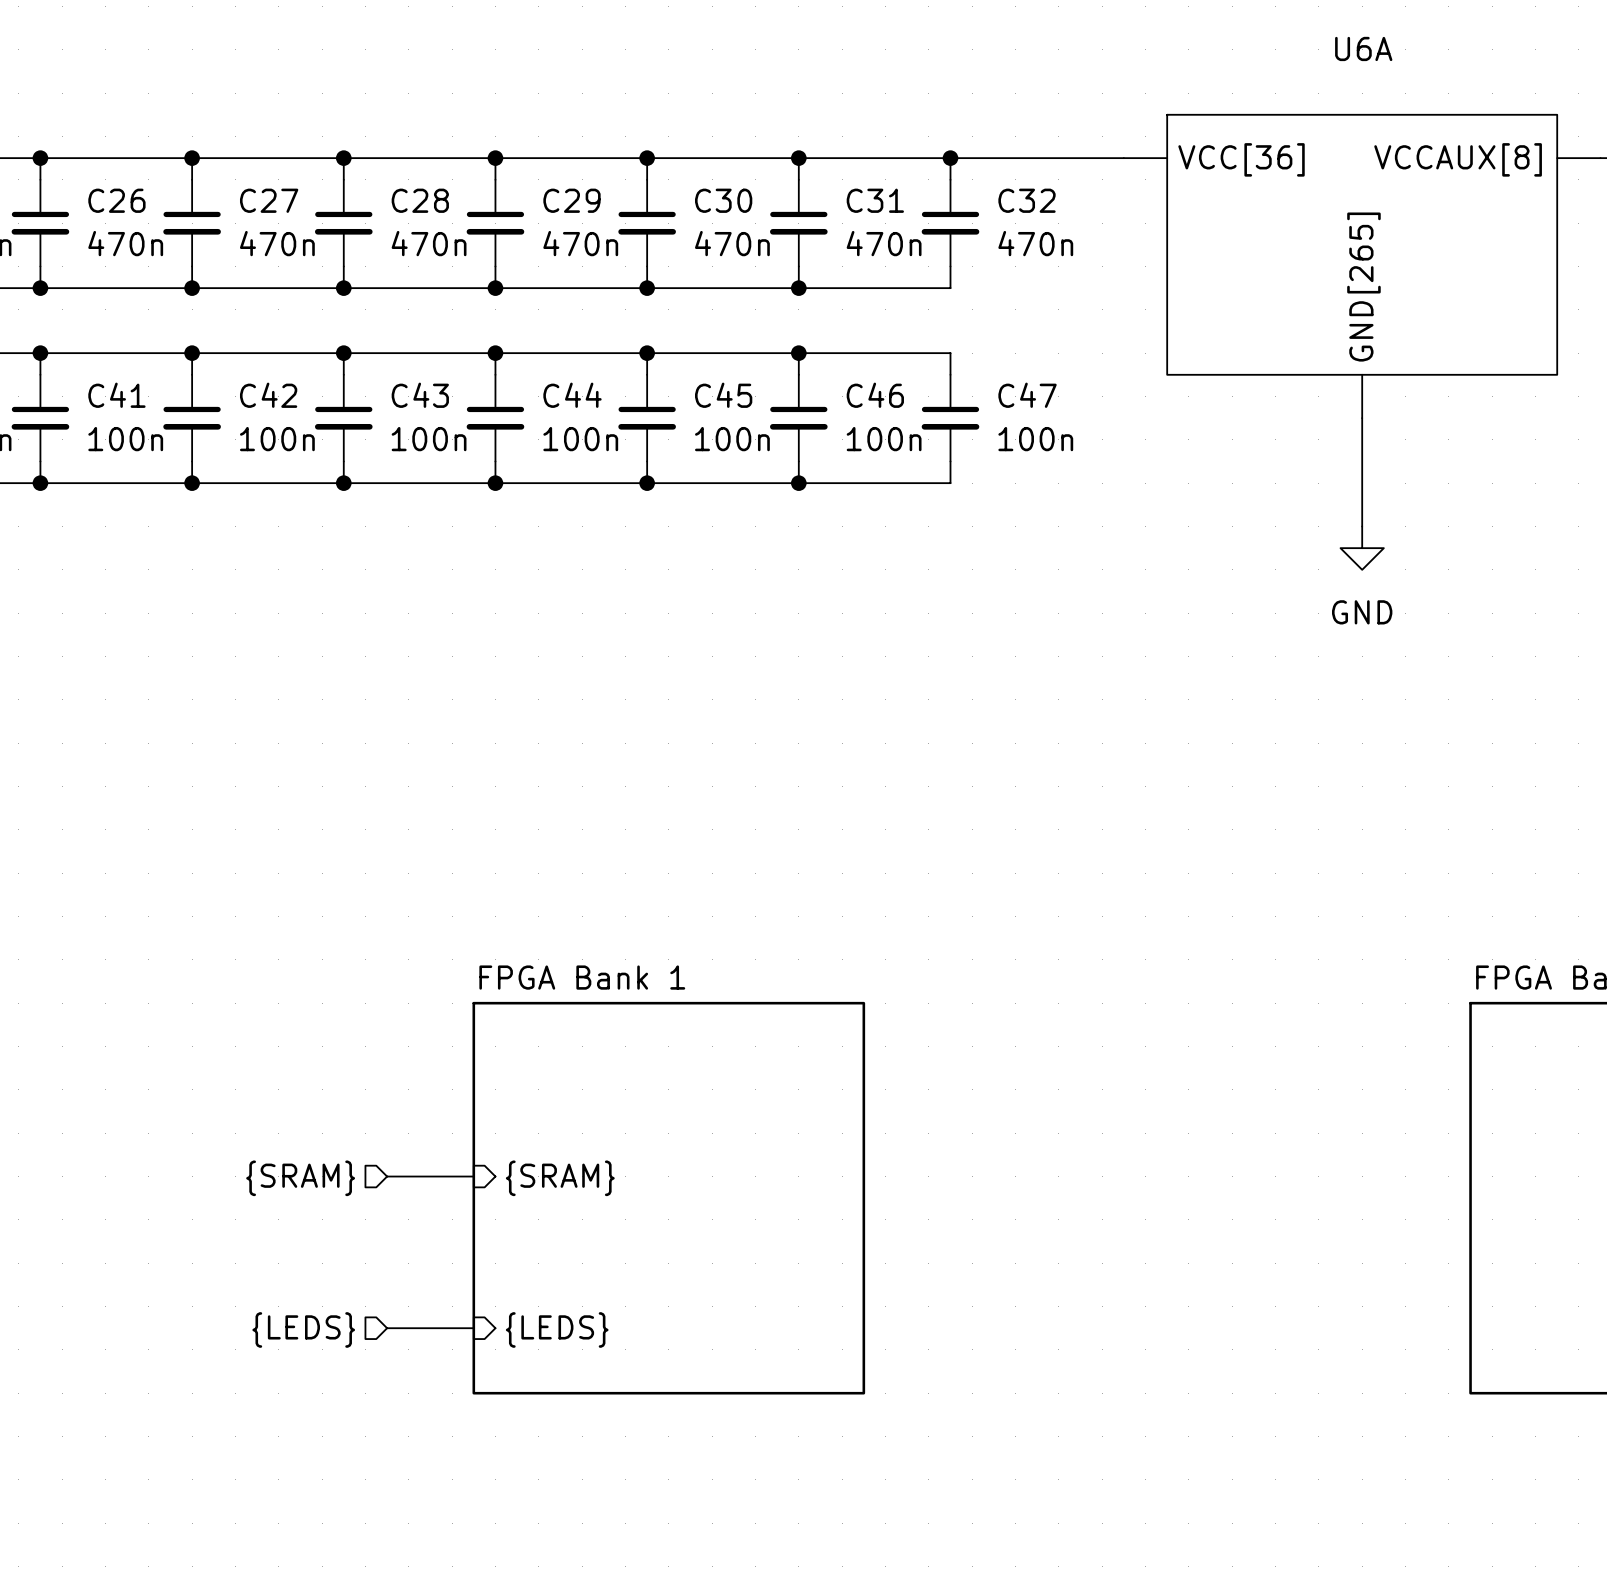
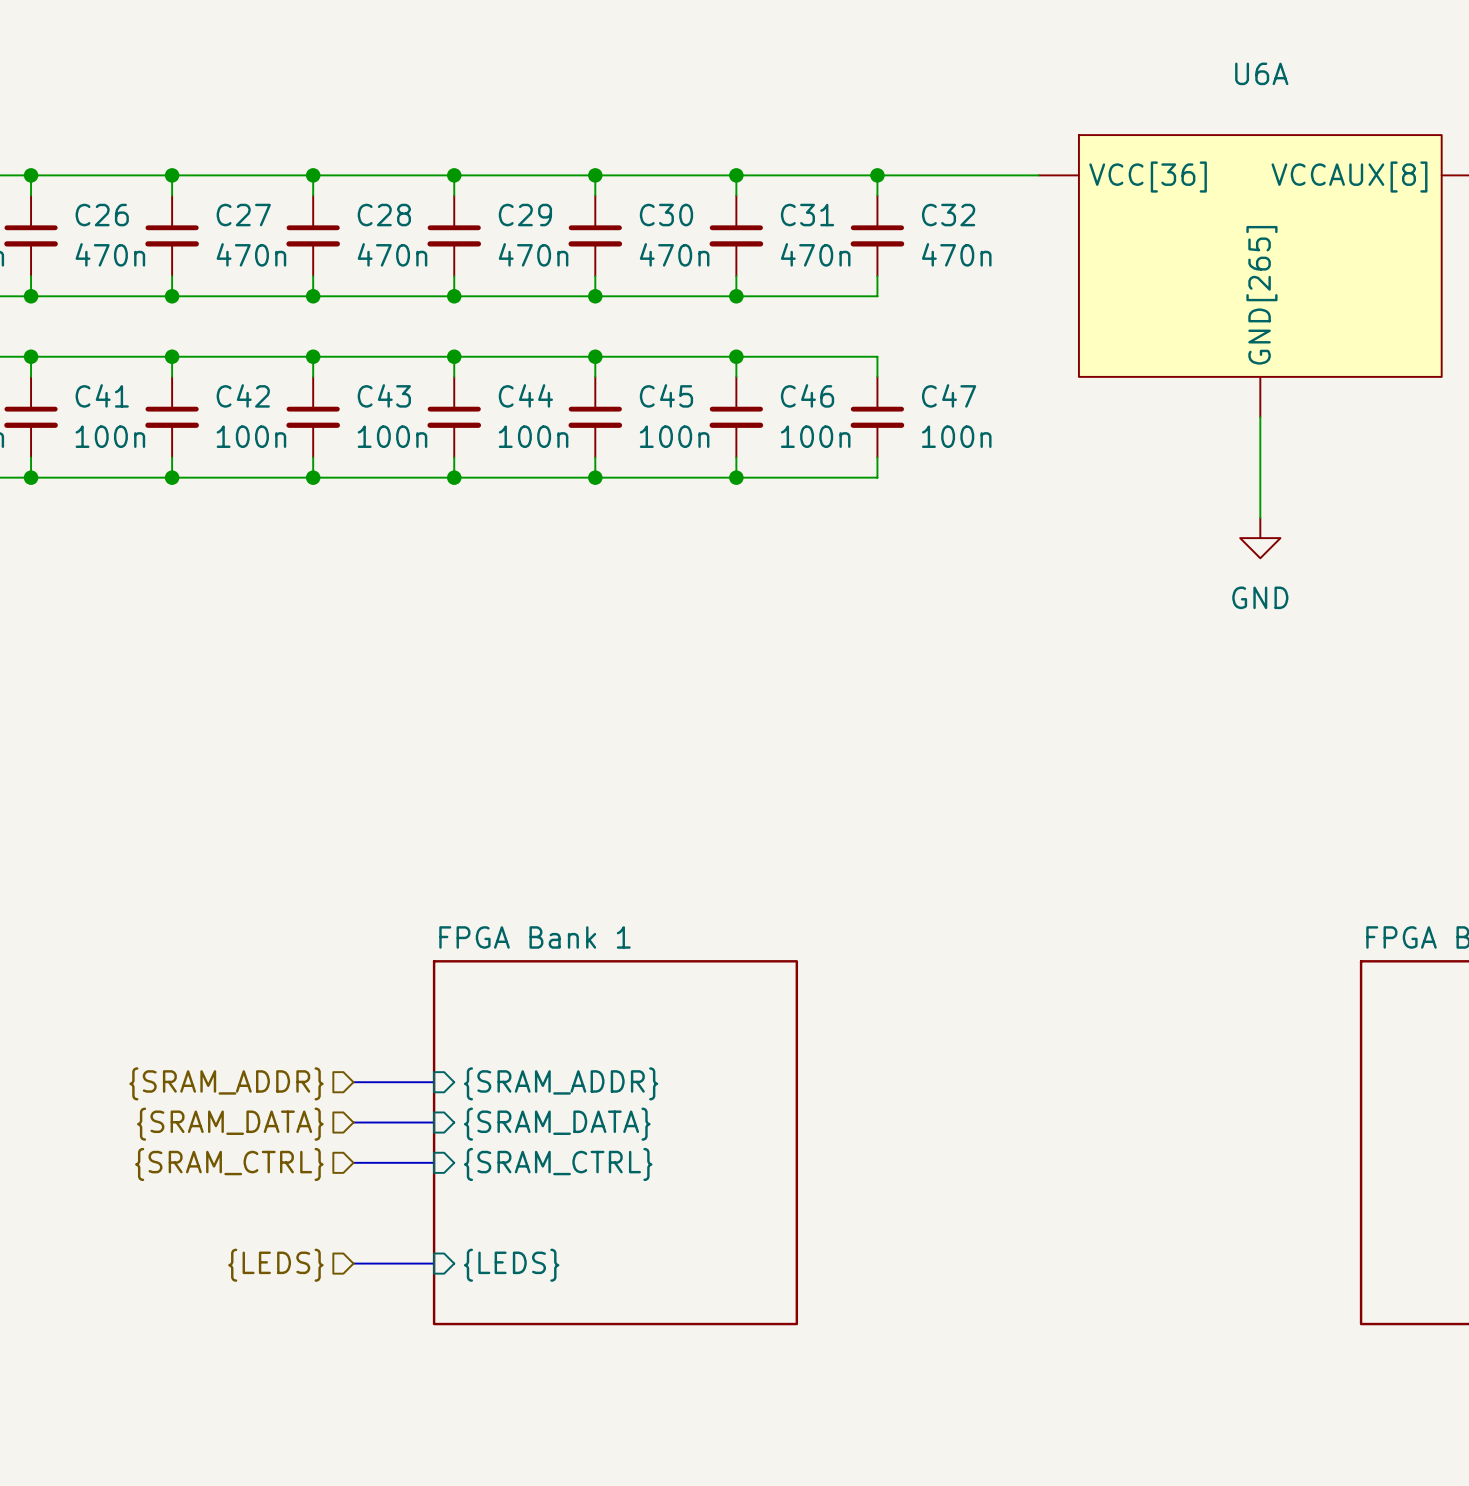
bus: none -> (353, 1082) (434, 1082)
hierarchical label: none -> {SRAM_ADDR} (226, 1083)
sheet pin: none -> {SRAM_ADDR} (561, 1083)
hierarchical label: {SRAM} (300, 1178) -> {SRAM_DATA} (230, 1124)
sheet pin: {SRAM} (560, 1178) -> {SRAM_DATA} (557, 1124)
bus: none -> (353, 1162) (434, 1162)
hierarchical label: none -> {SRAM_CTRL} (229, 1164)
sheet pin: none -> {SRAM_CTRL} (558, 1164)

